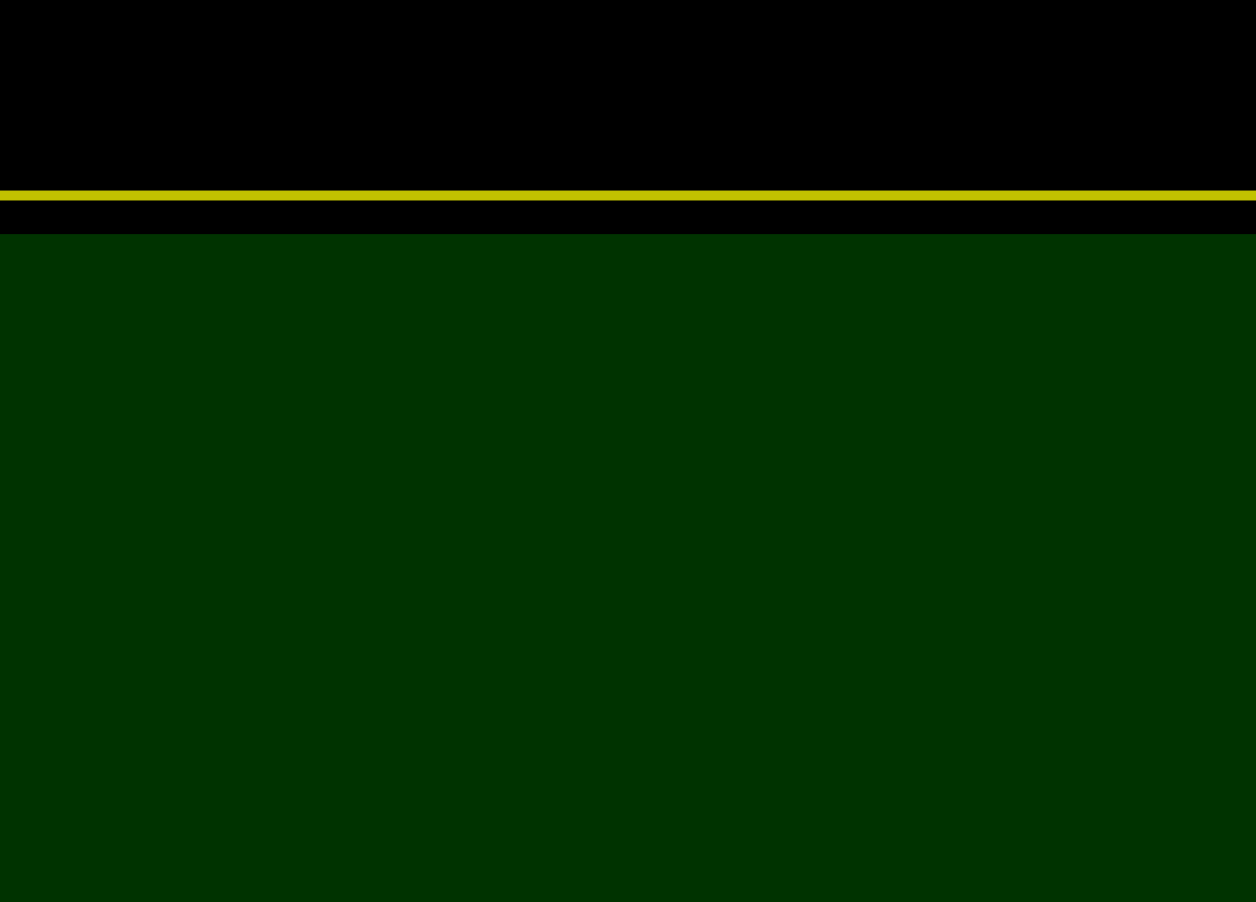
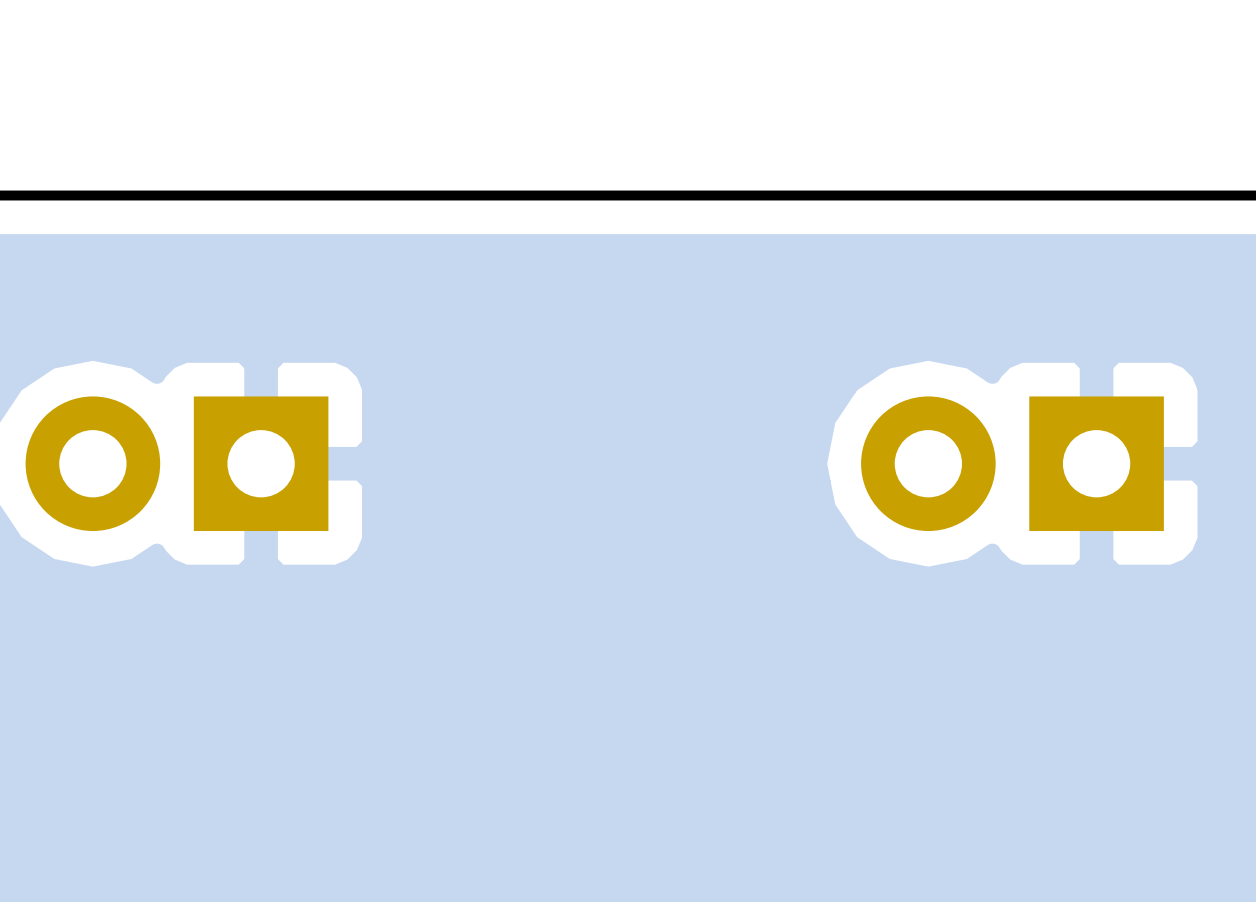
part: none -> (177, 463)
part: none -> (1012, 463)

